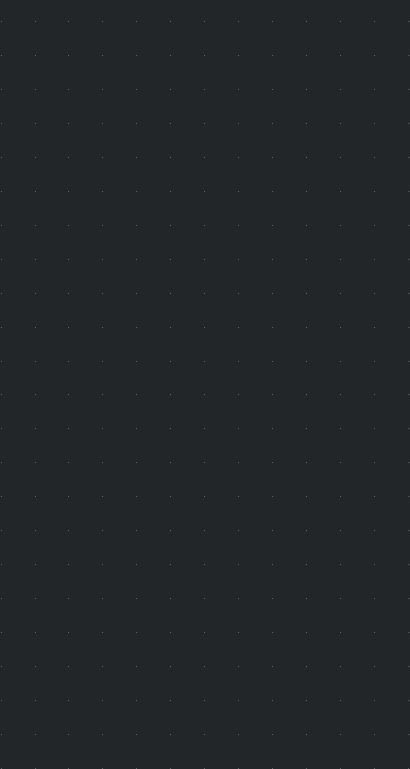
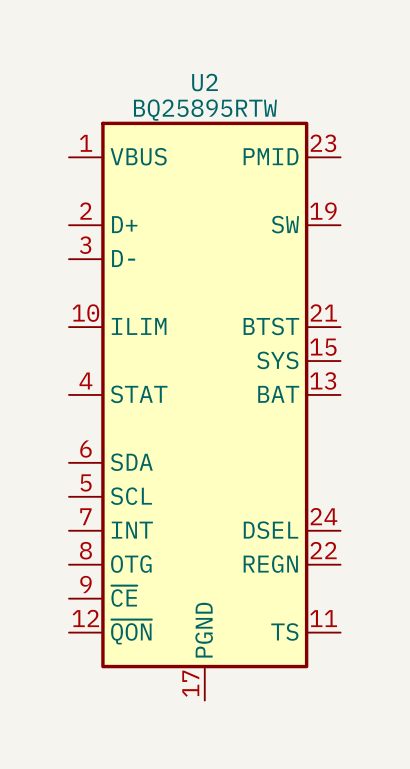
U2: none -> BQ25895RTW (204, 411)

